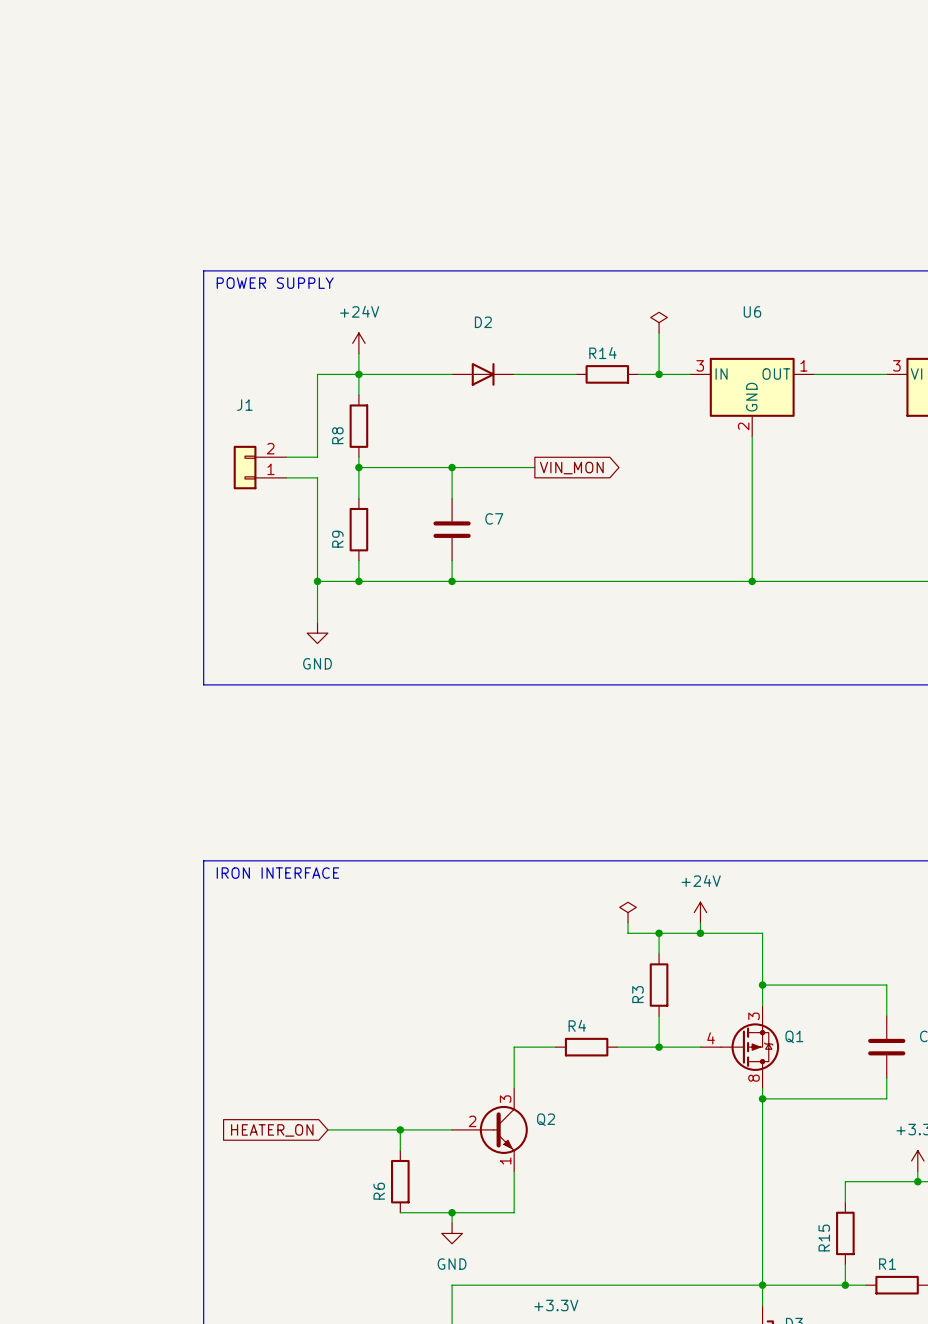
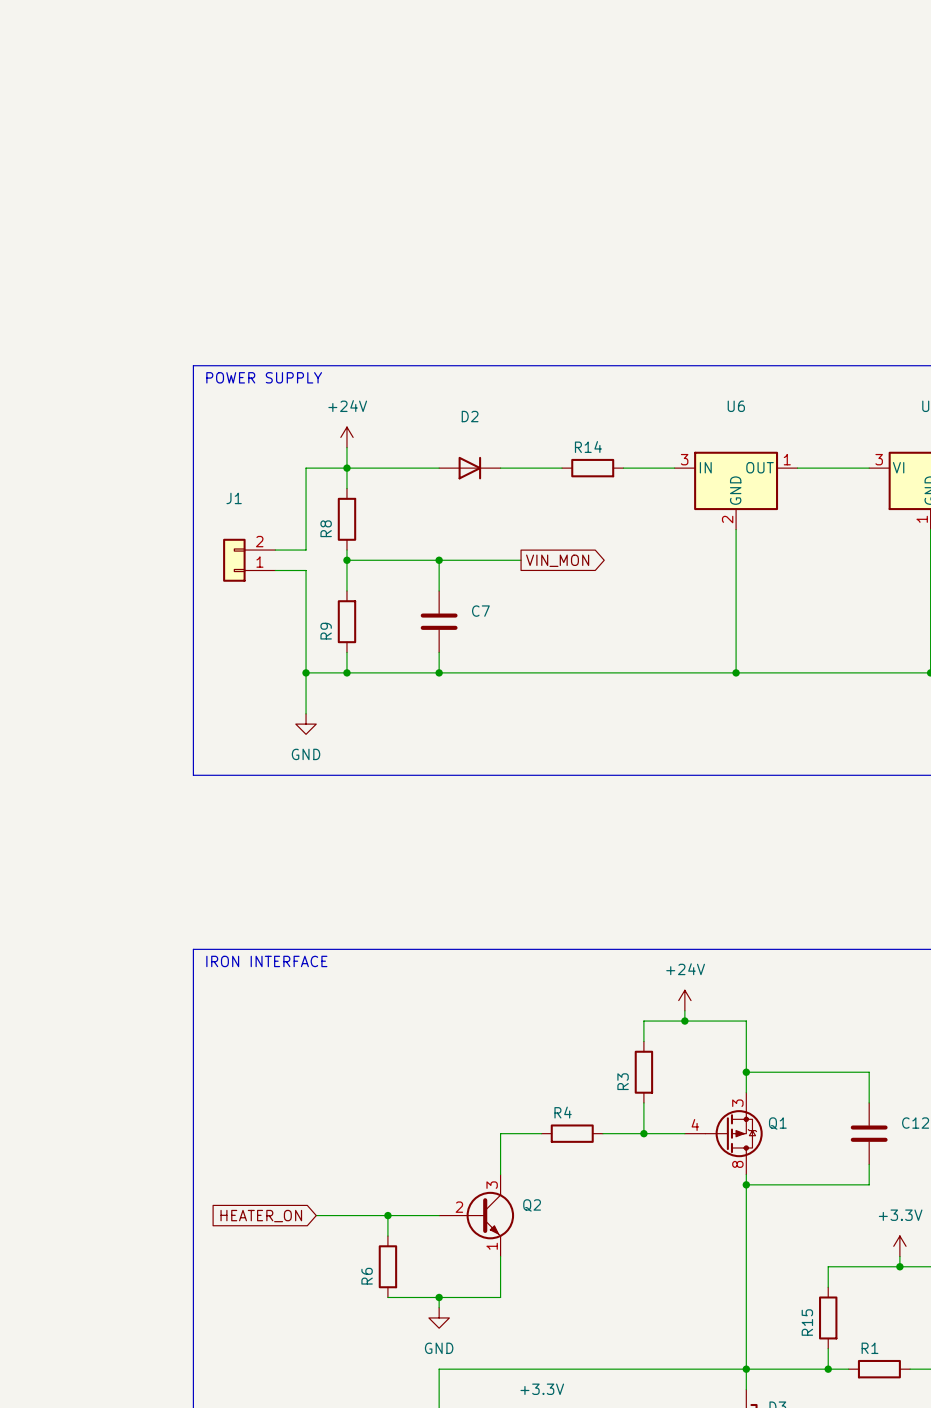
power symbol: (659, 322) -> none
wire: (659, 333) (659, 374) -> none
junction: (659, 374) -> none
power symbol: (628, 912) -> none
wire: (628, 922) (628, 933) (659, 933) -> none
junction: (659, 933) -> none

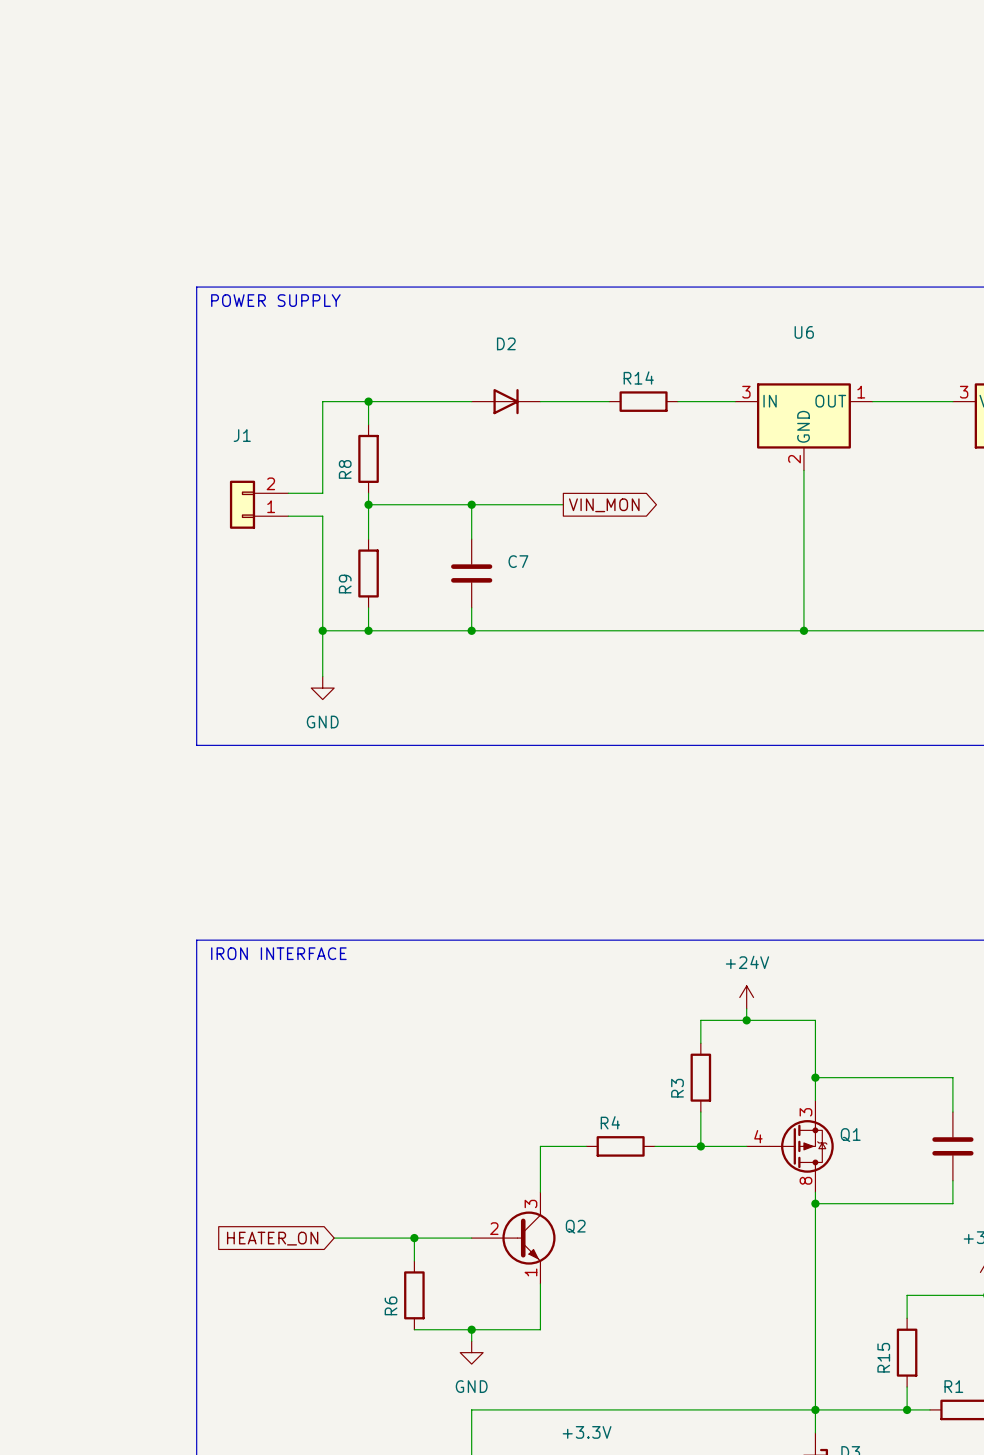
power symbol: +24V (346, 437) -> none
wire: (346, 447) (346, 468) -> none

